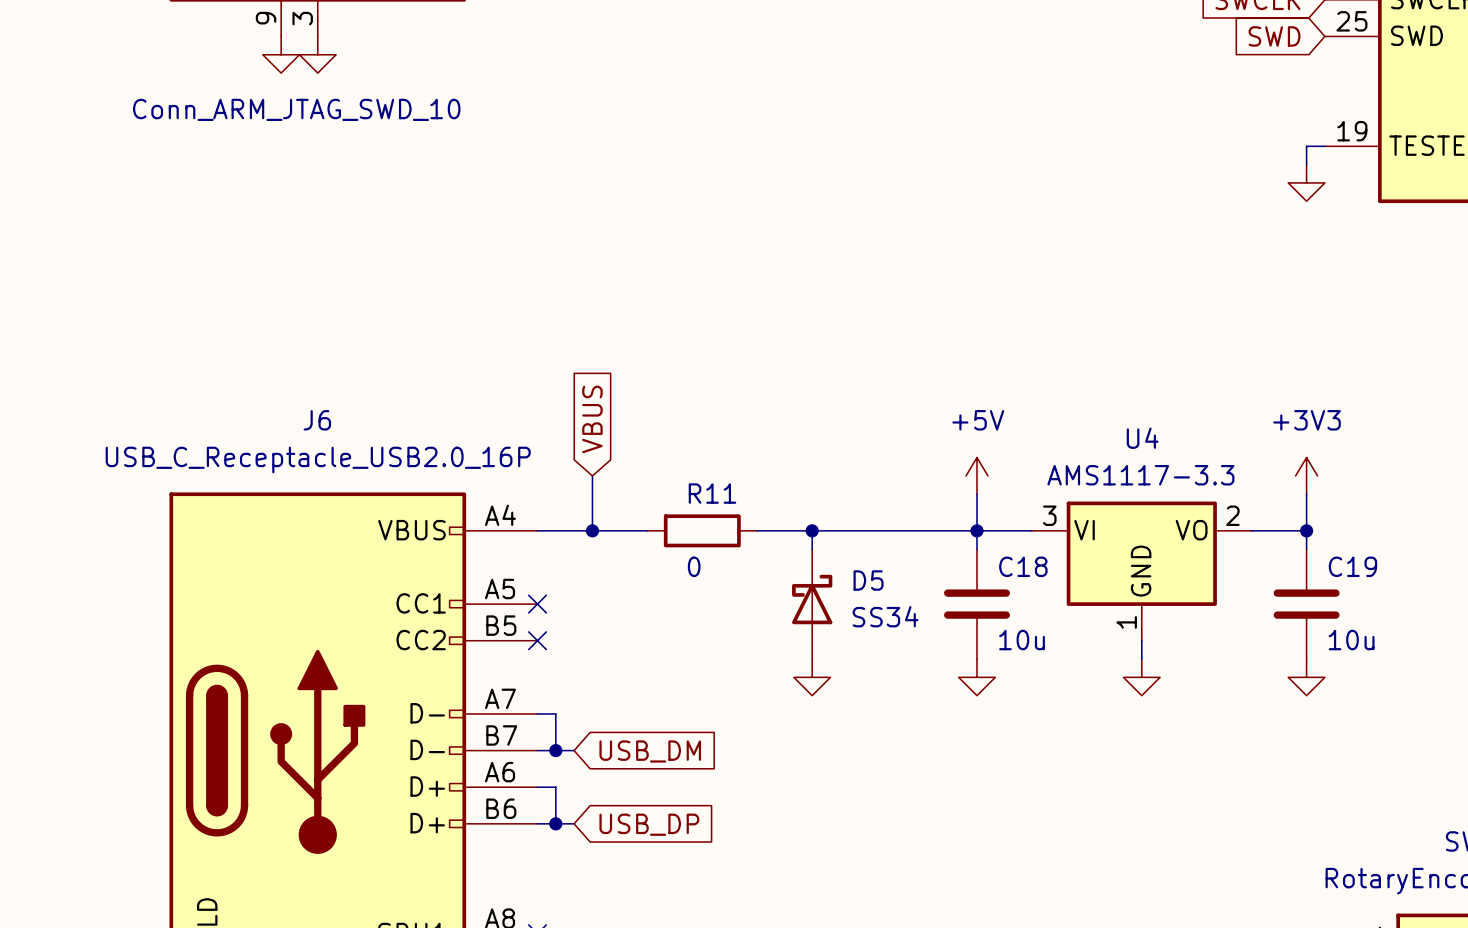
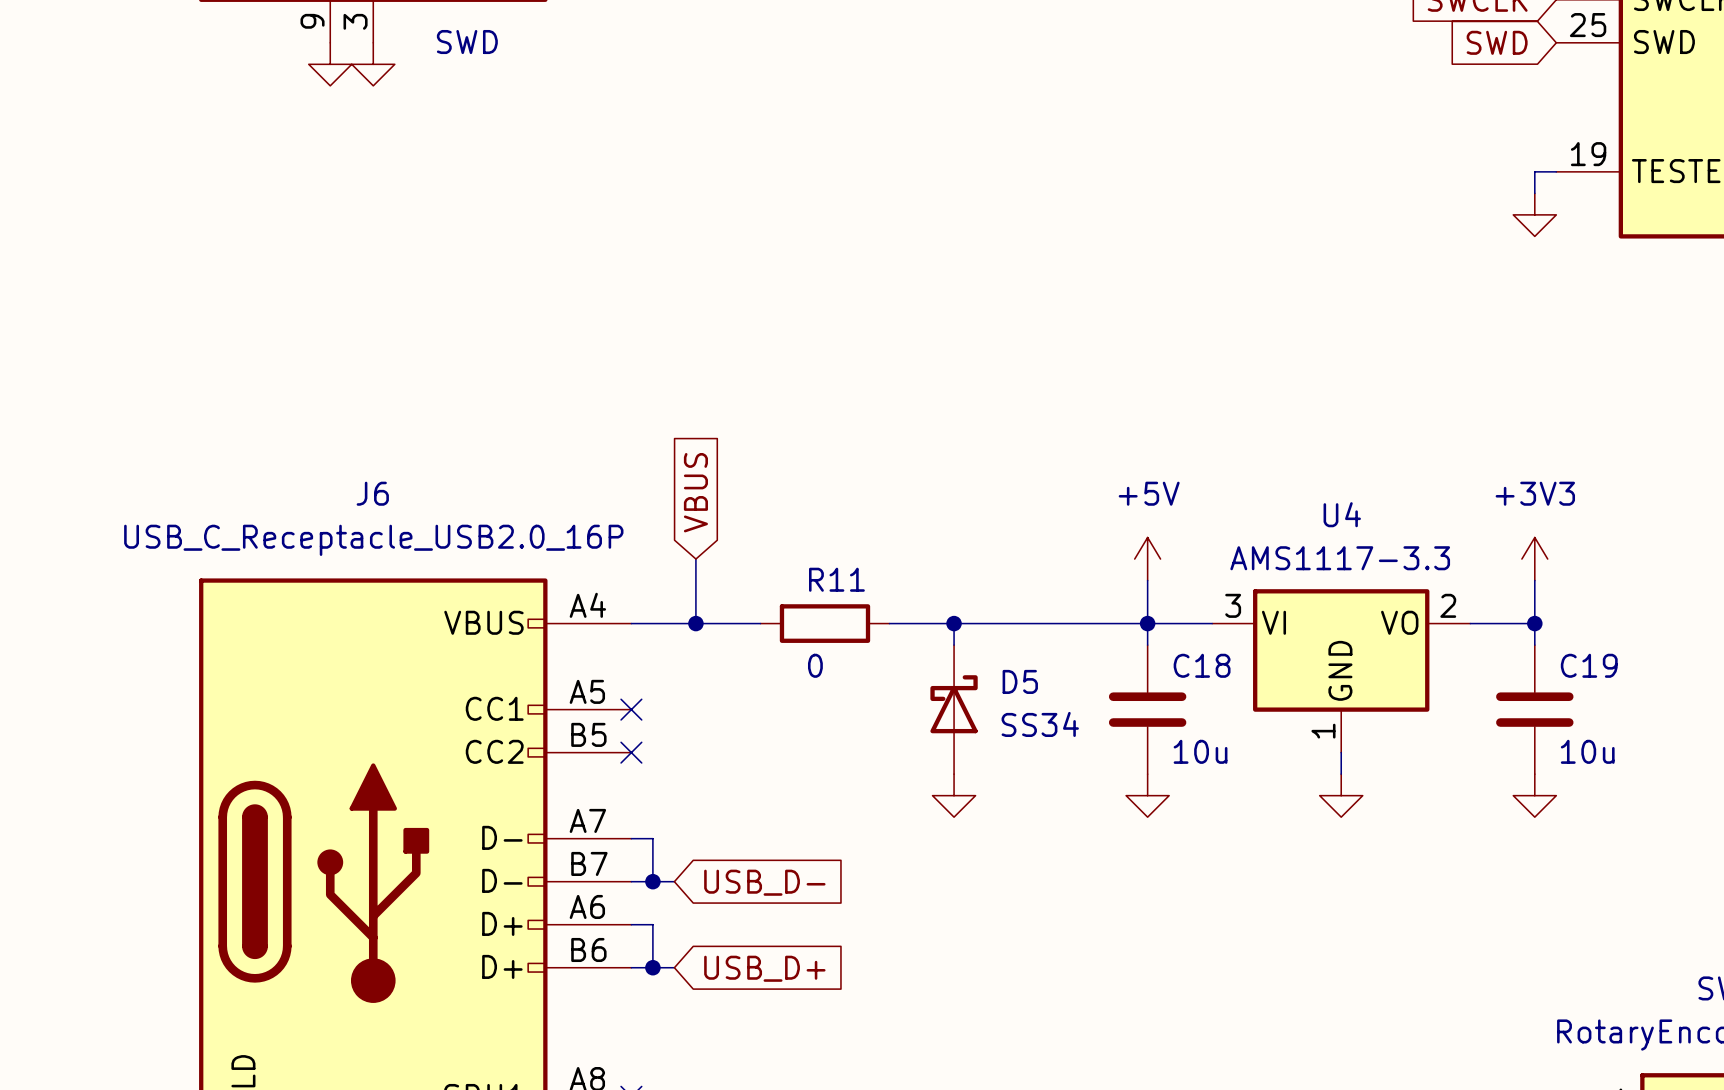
part value: Conn_ARM_JTAG_SWD_10 (296, 109) -> SWD (467, 42)
global label: USB_DM (650, 751) -> USB_D- (764, 882)
global label: USB_DP (649, 824) -> USB_D+ (764, 968)

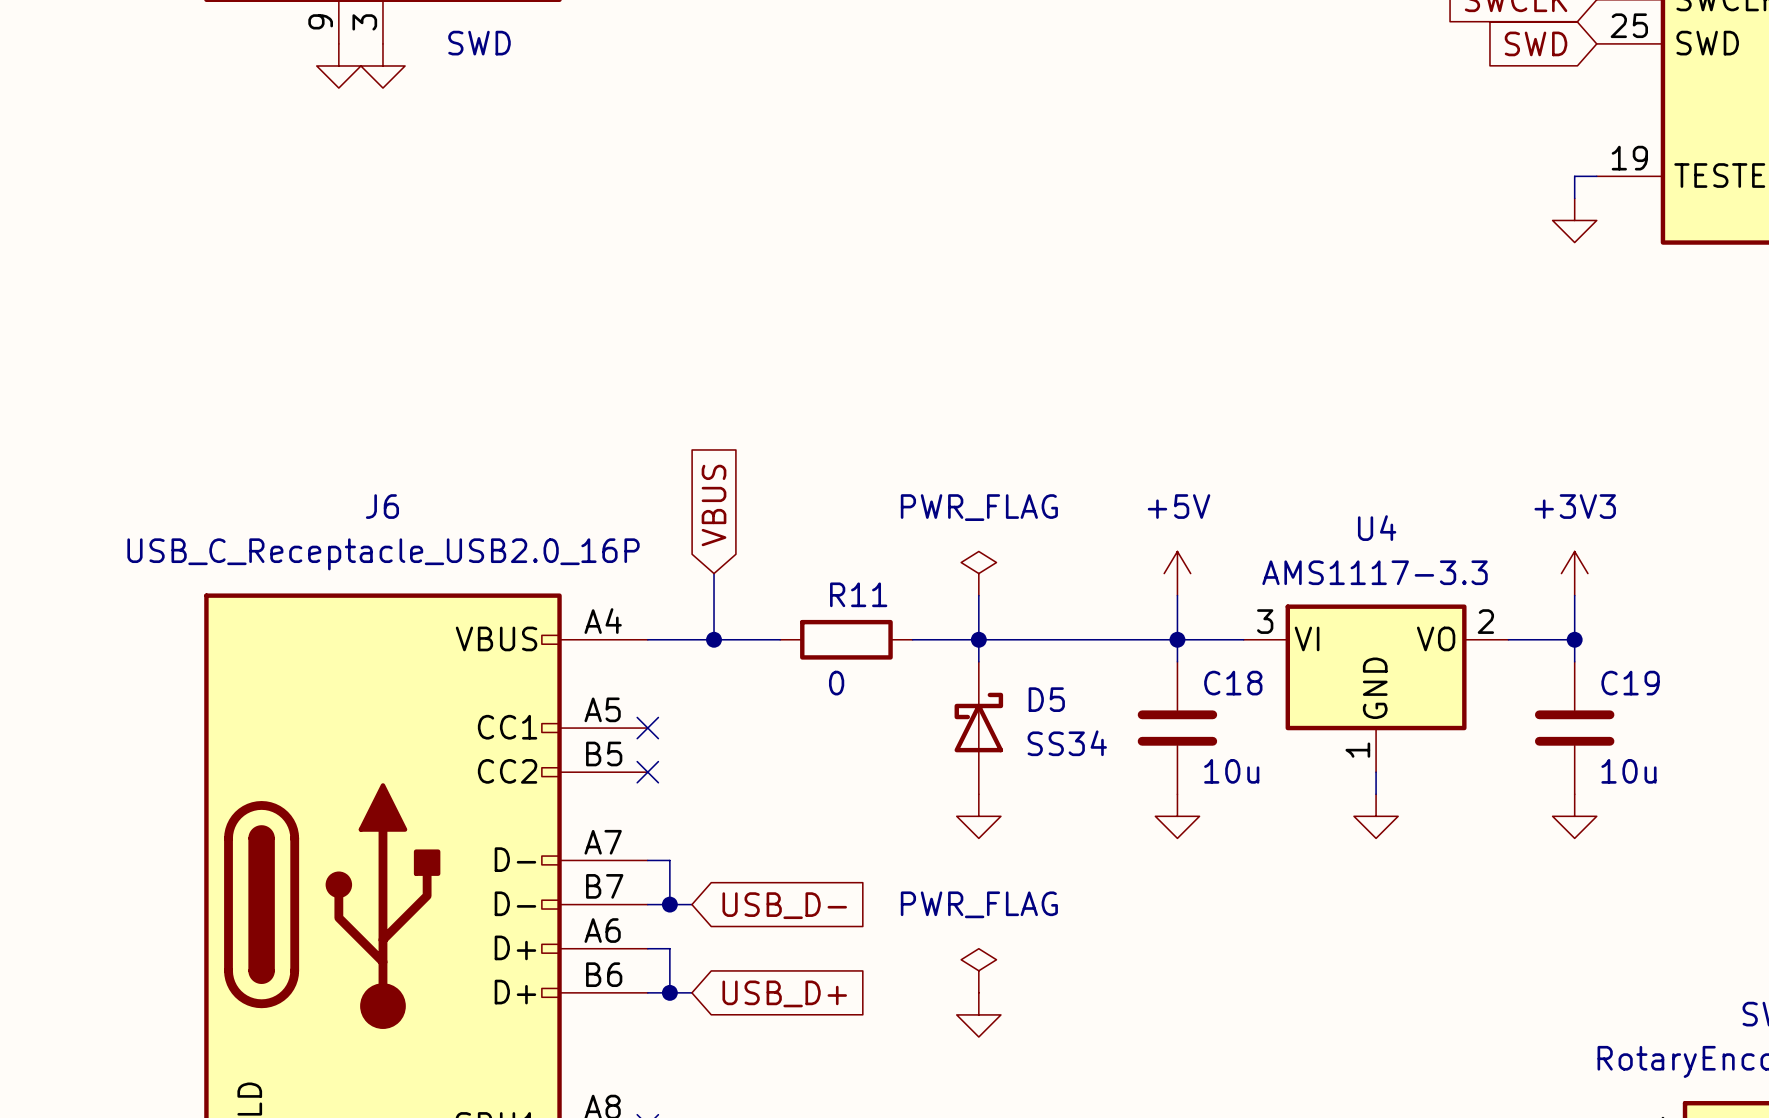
power symbol: none -> PWR_FLAG (978, 573)
wire: none -> (978, 595) (978, 639)
power symbol: none -> PWR_FLAG (978, 970)
power symbol: none -> (978, 1014)

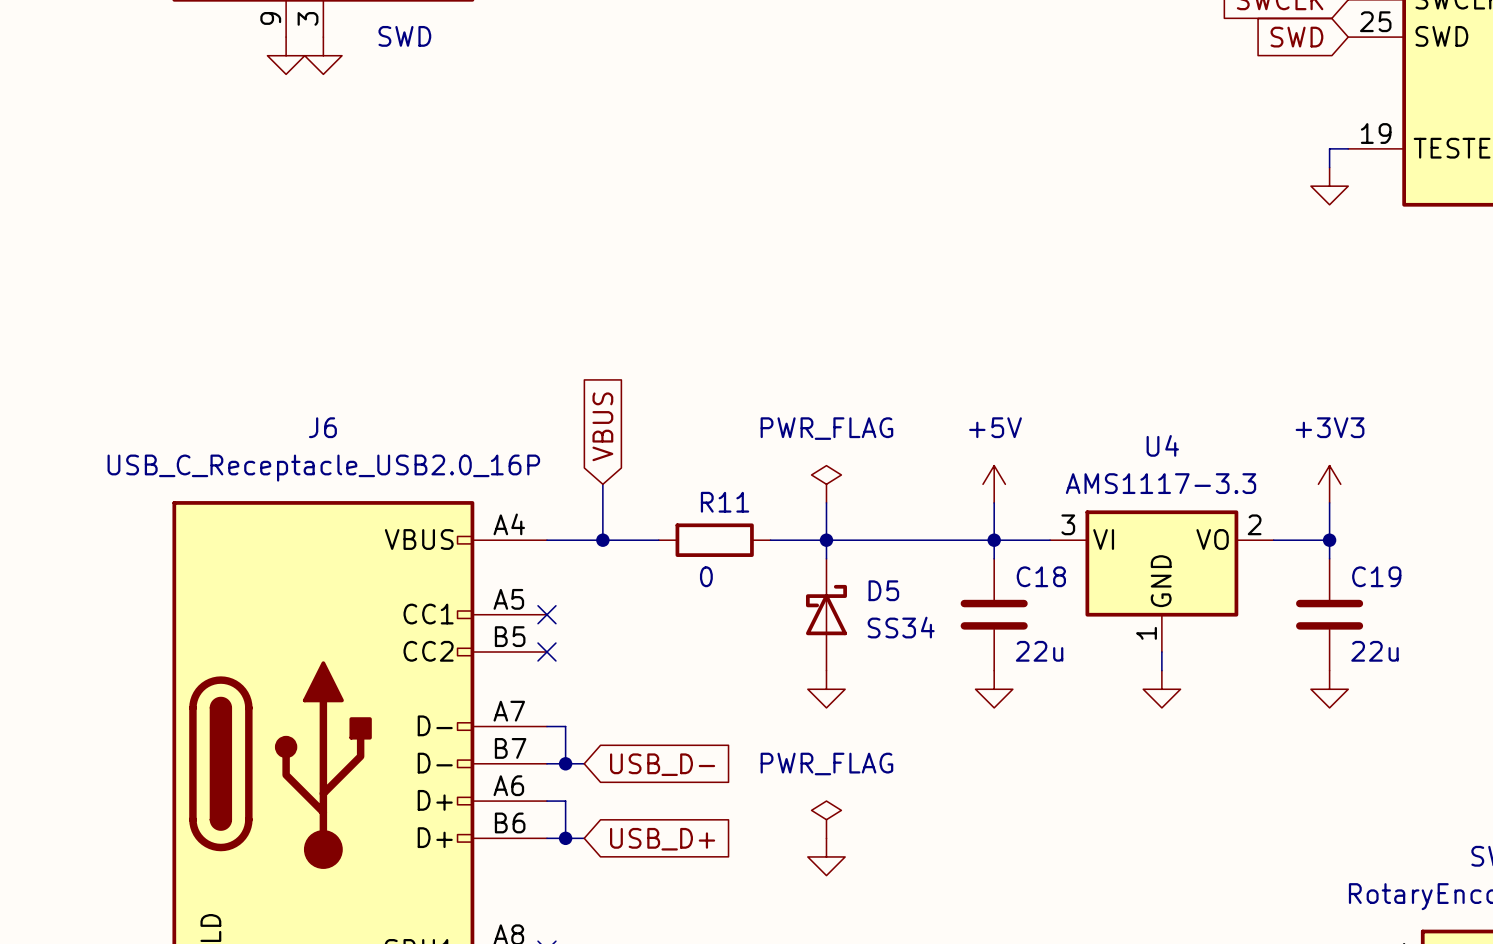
C18 value: 10u (1231, 771) -> 22u (1039, 651)
C19 value: 10u (1628, 771) -> 22u (1374, 651)

